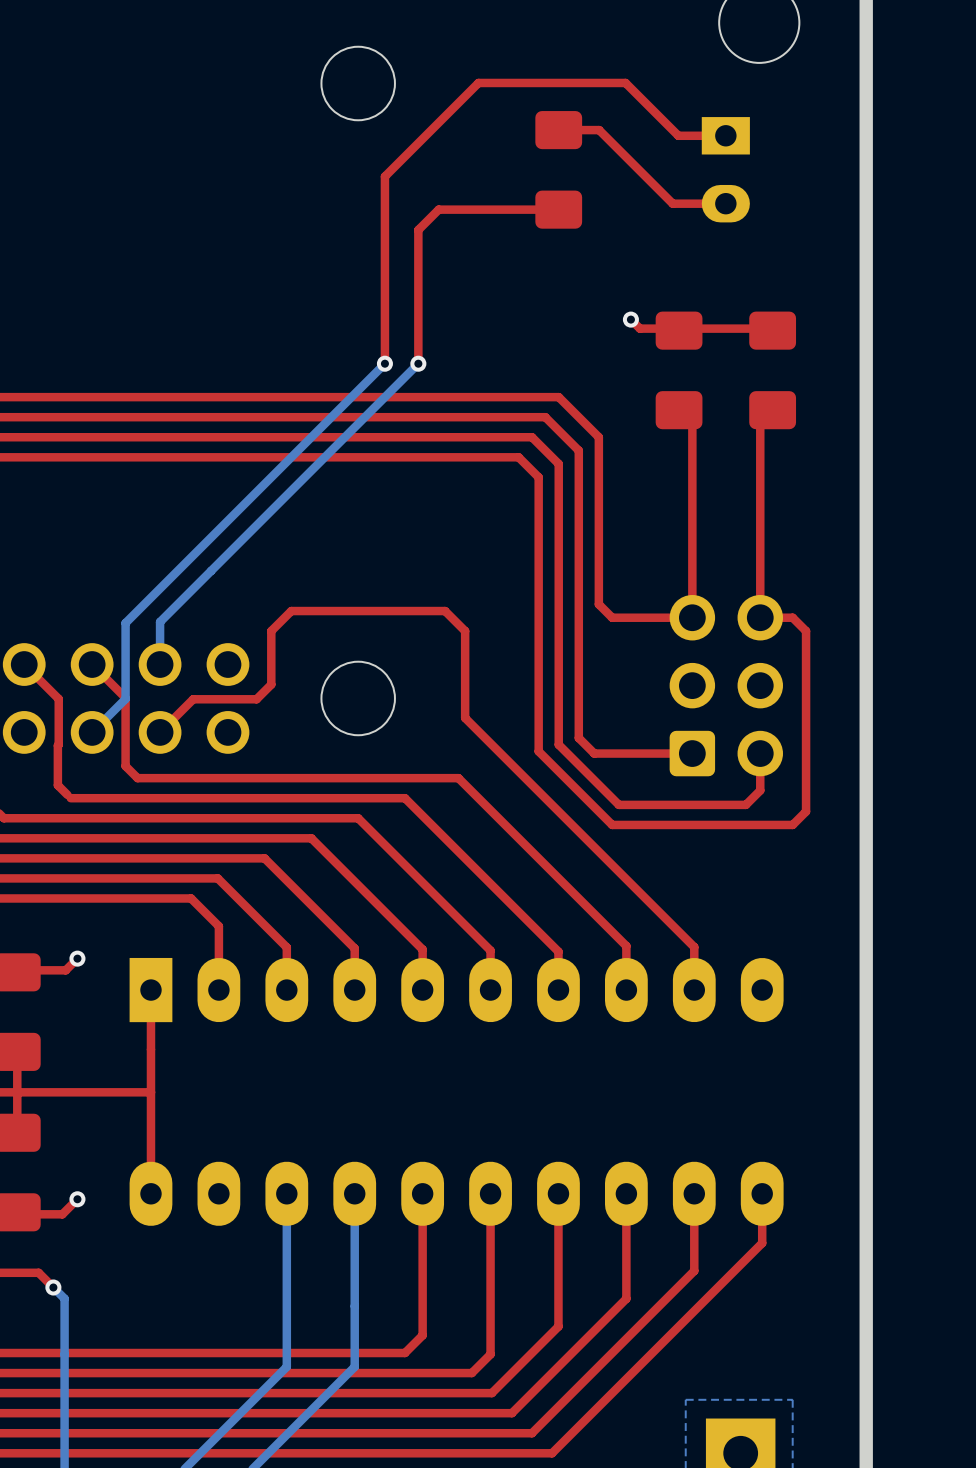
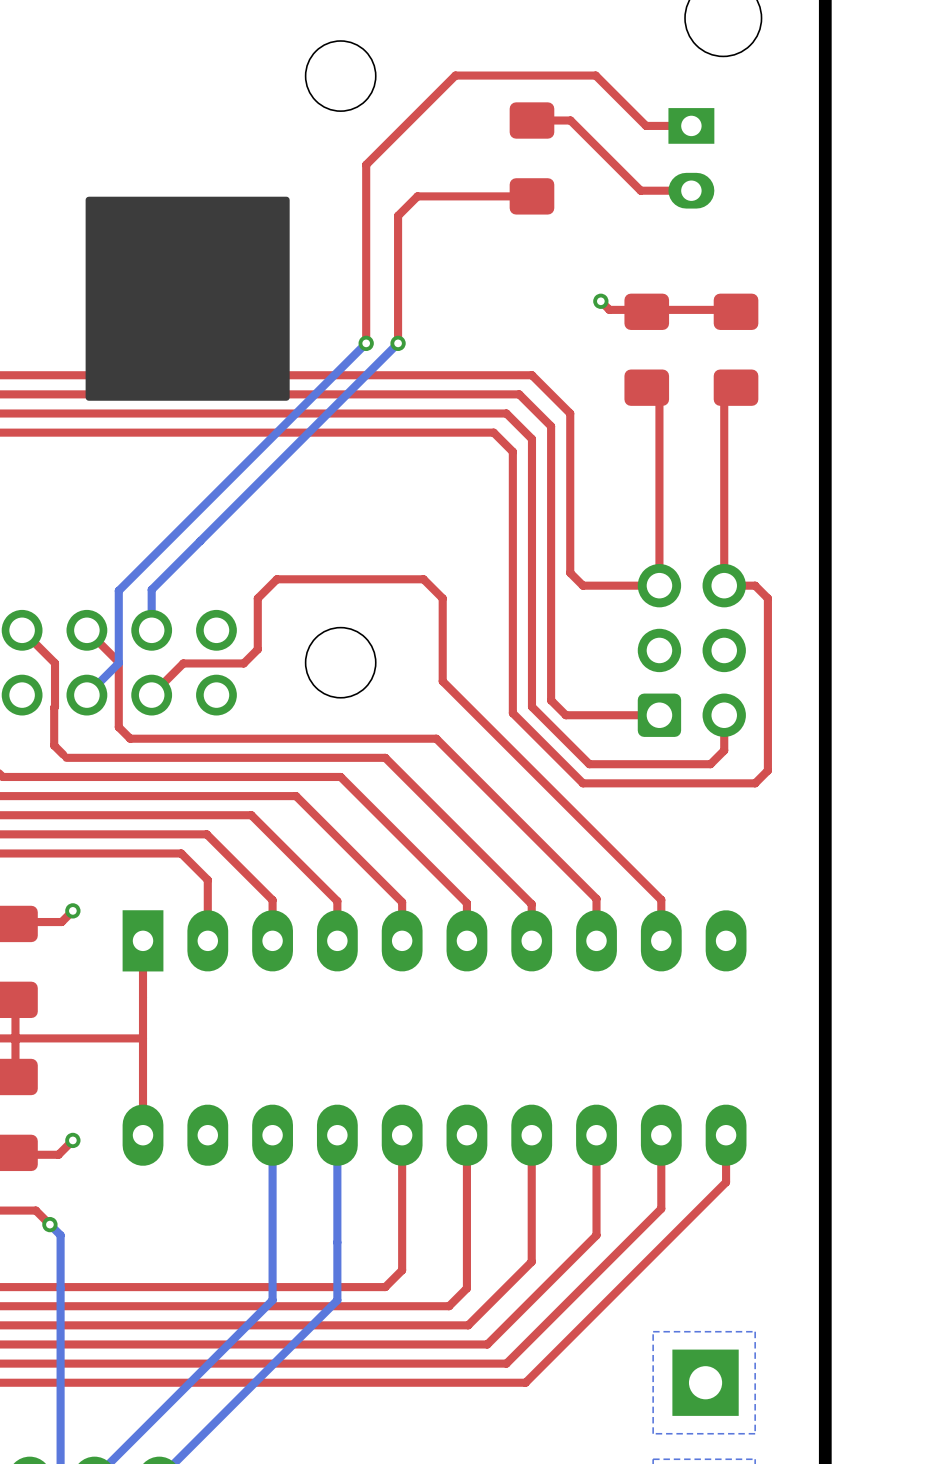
drawing: none -> [85, 196, 290, 401]

